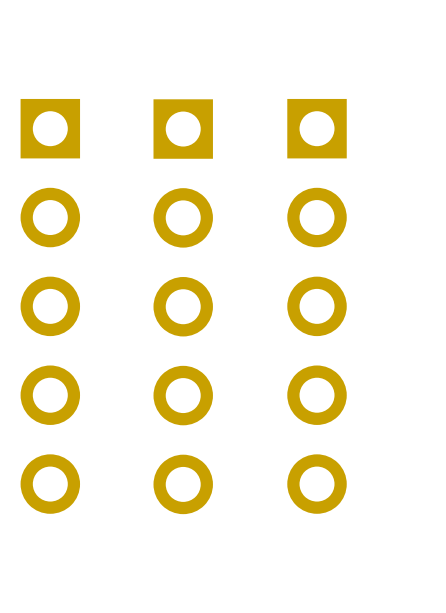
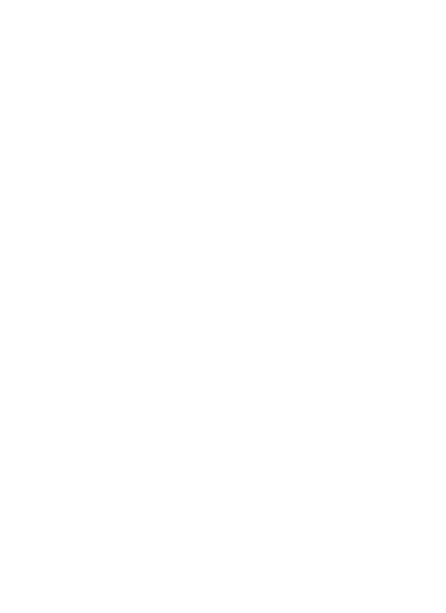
part: (50, 306) -> none
part: (183, 306) -> none
part: (317, 306) -> none

